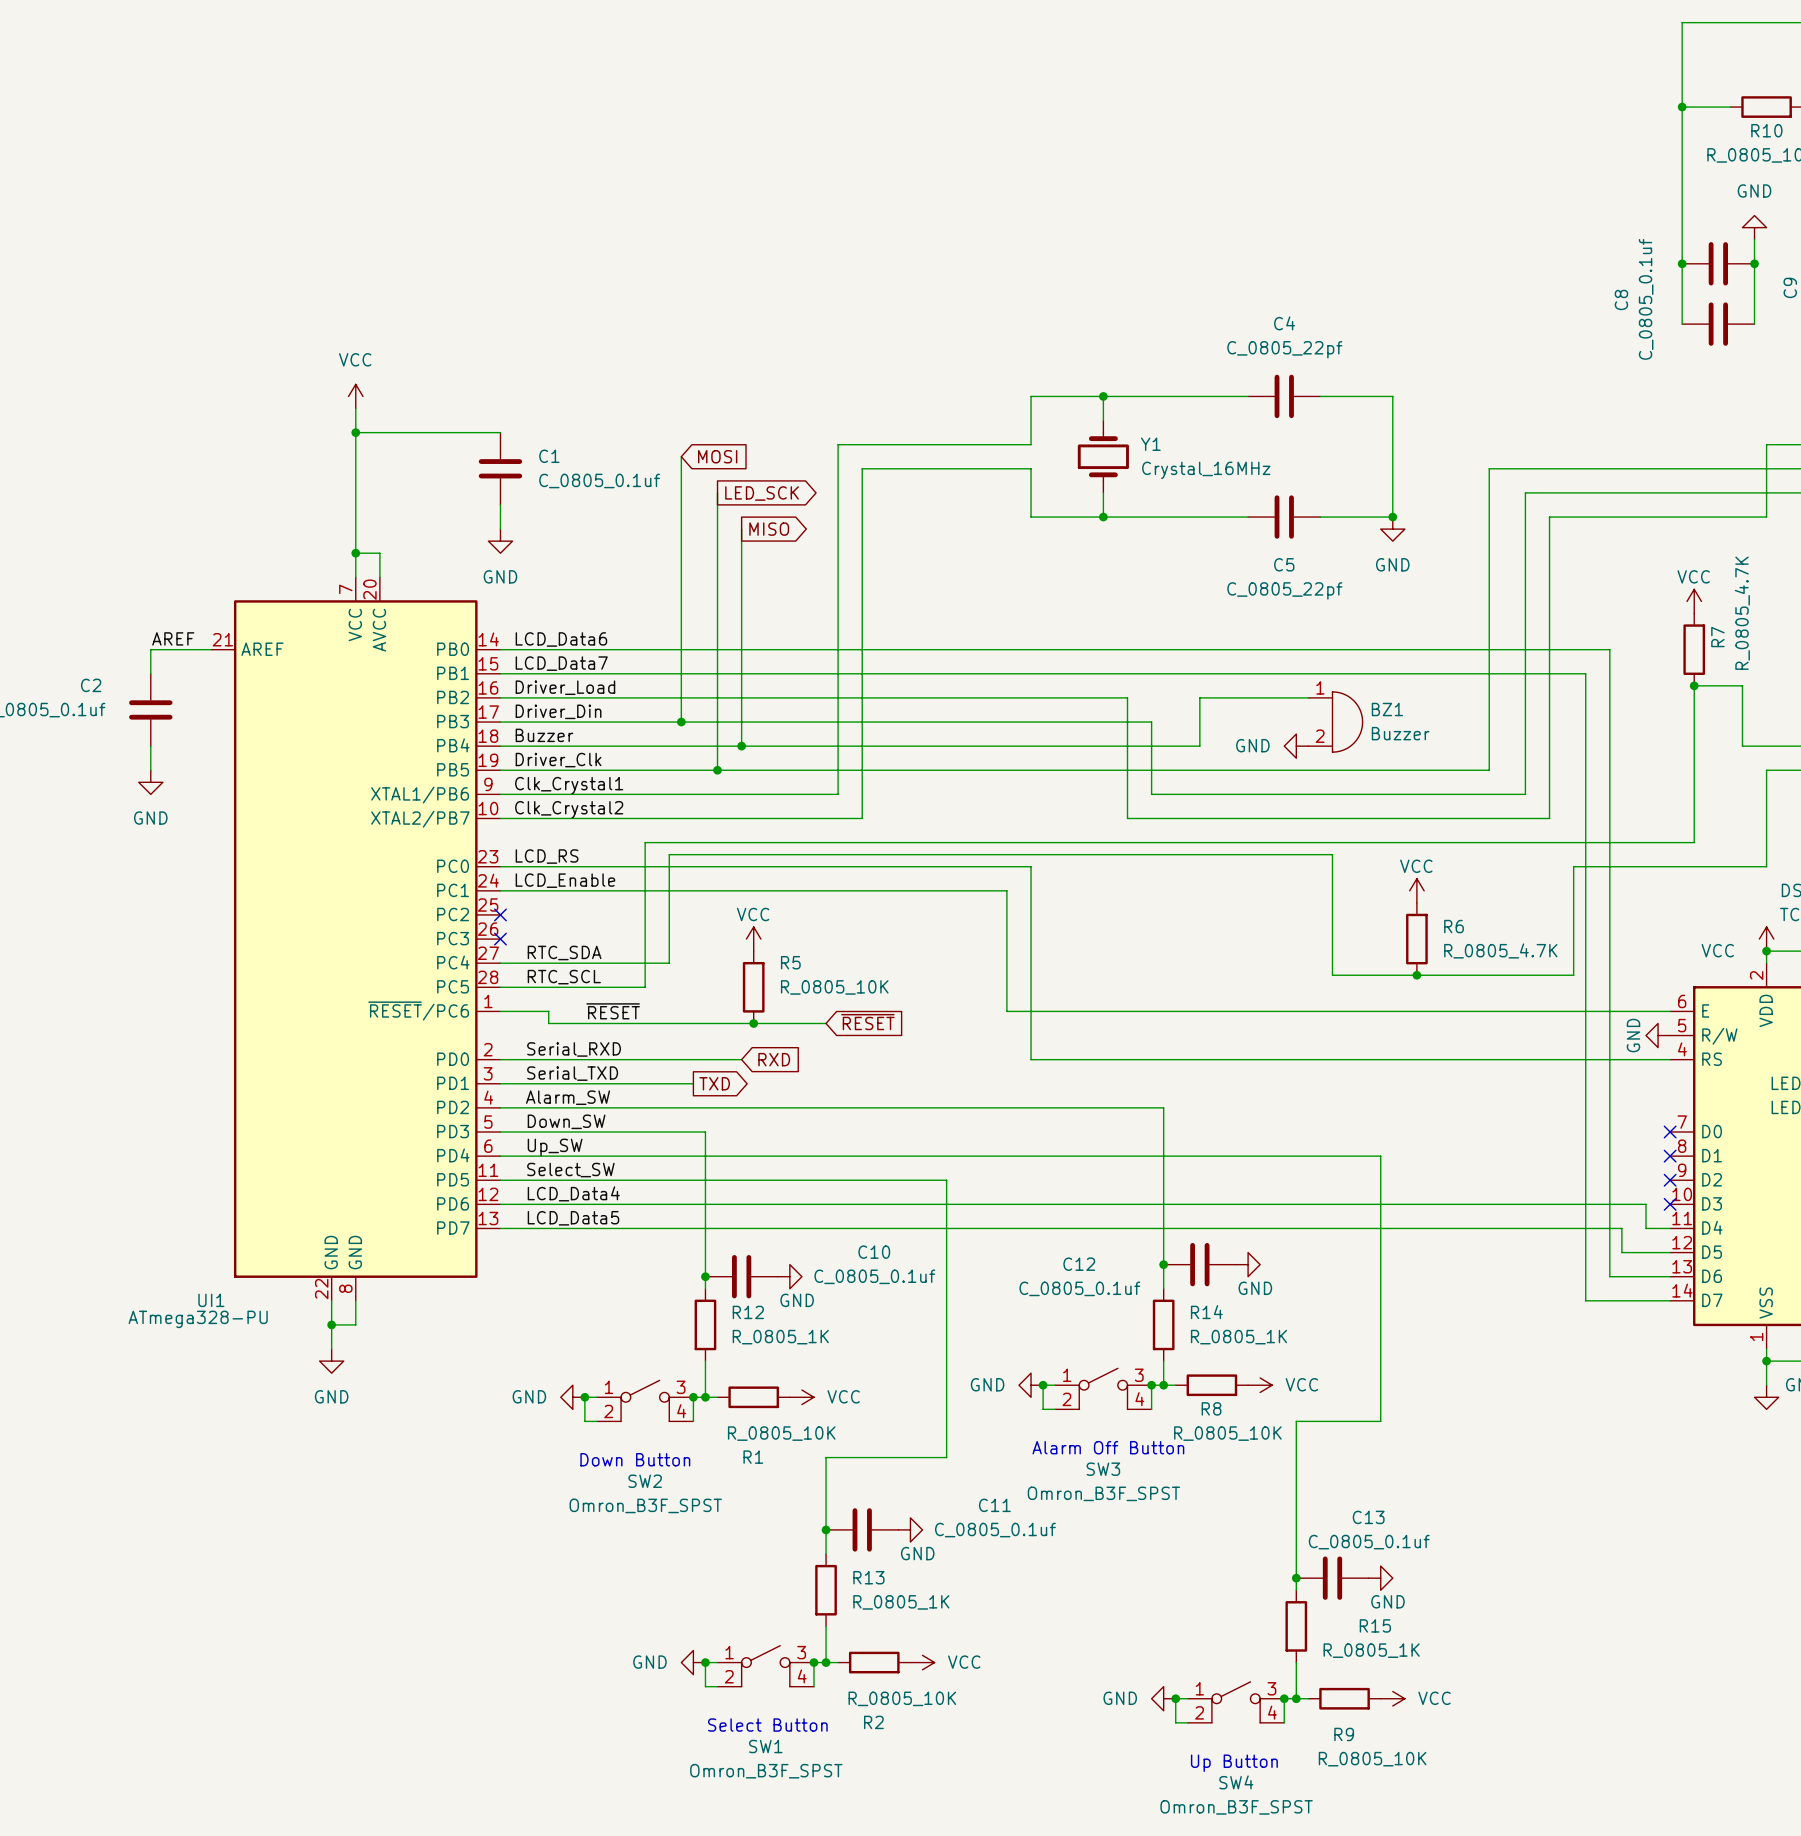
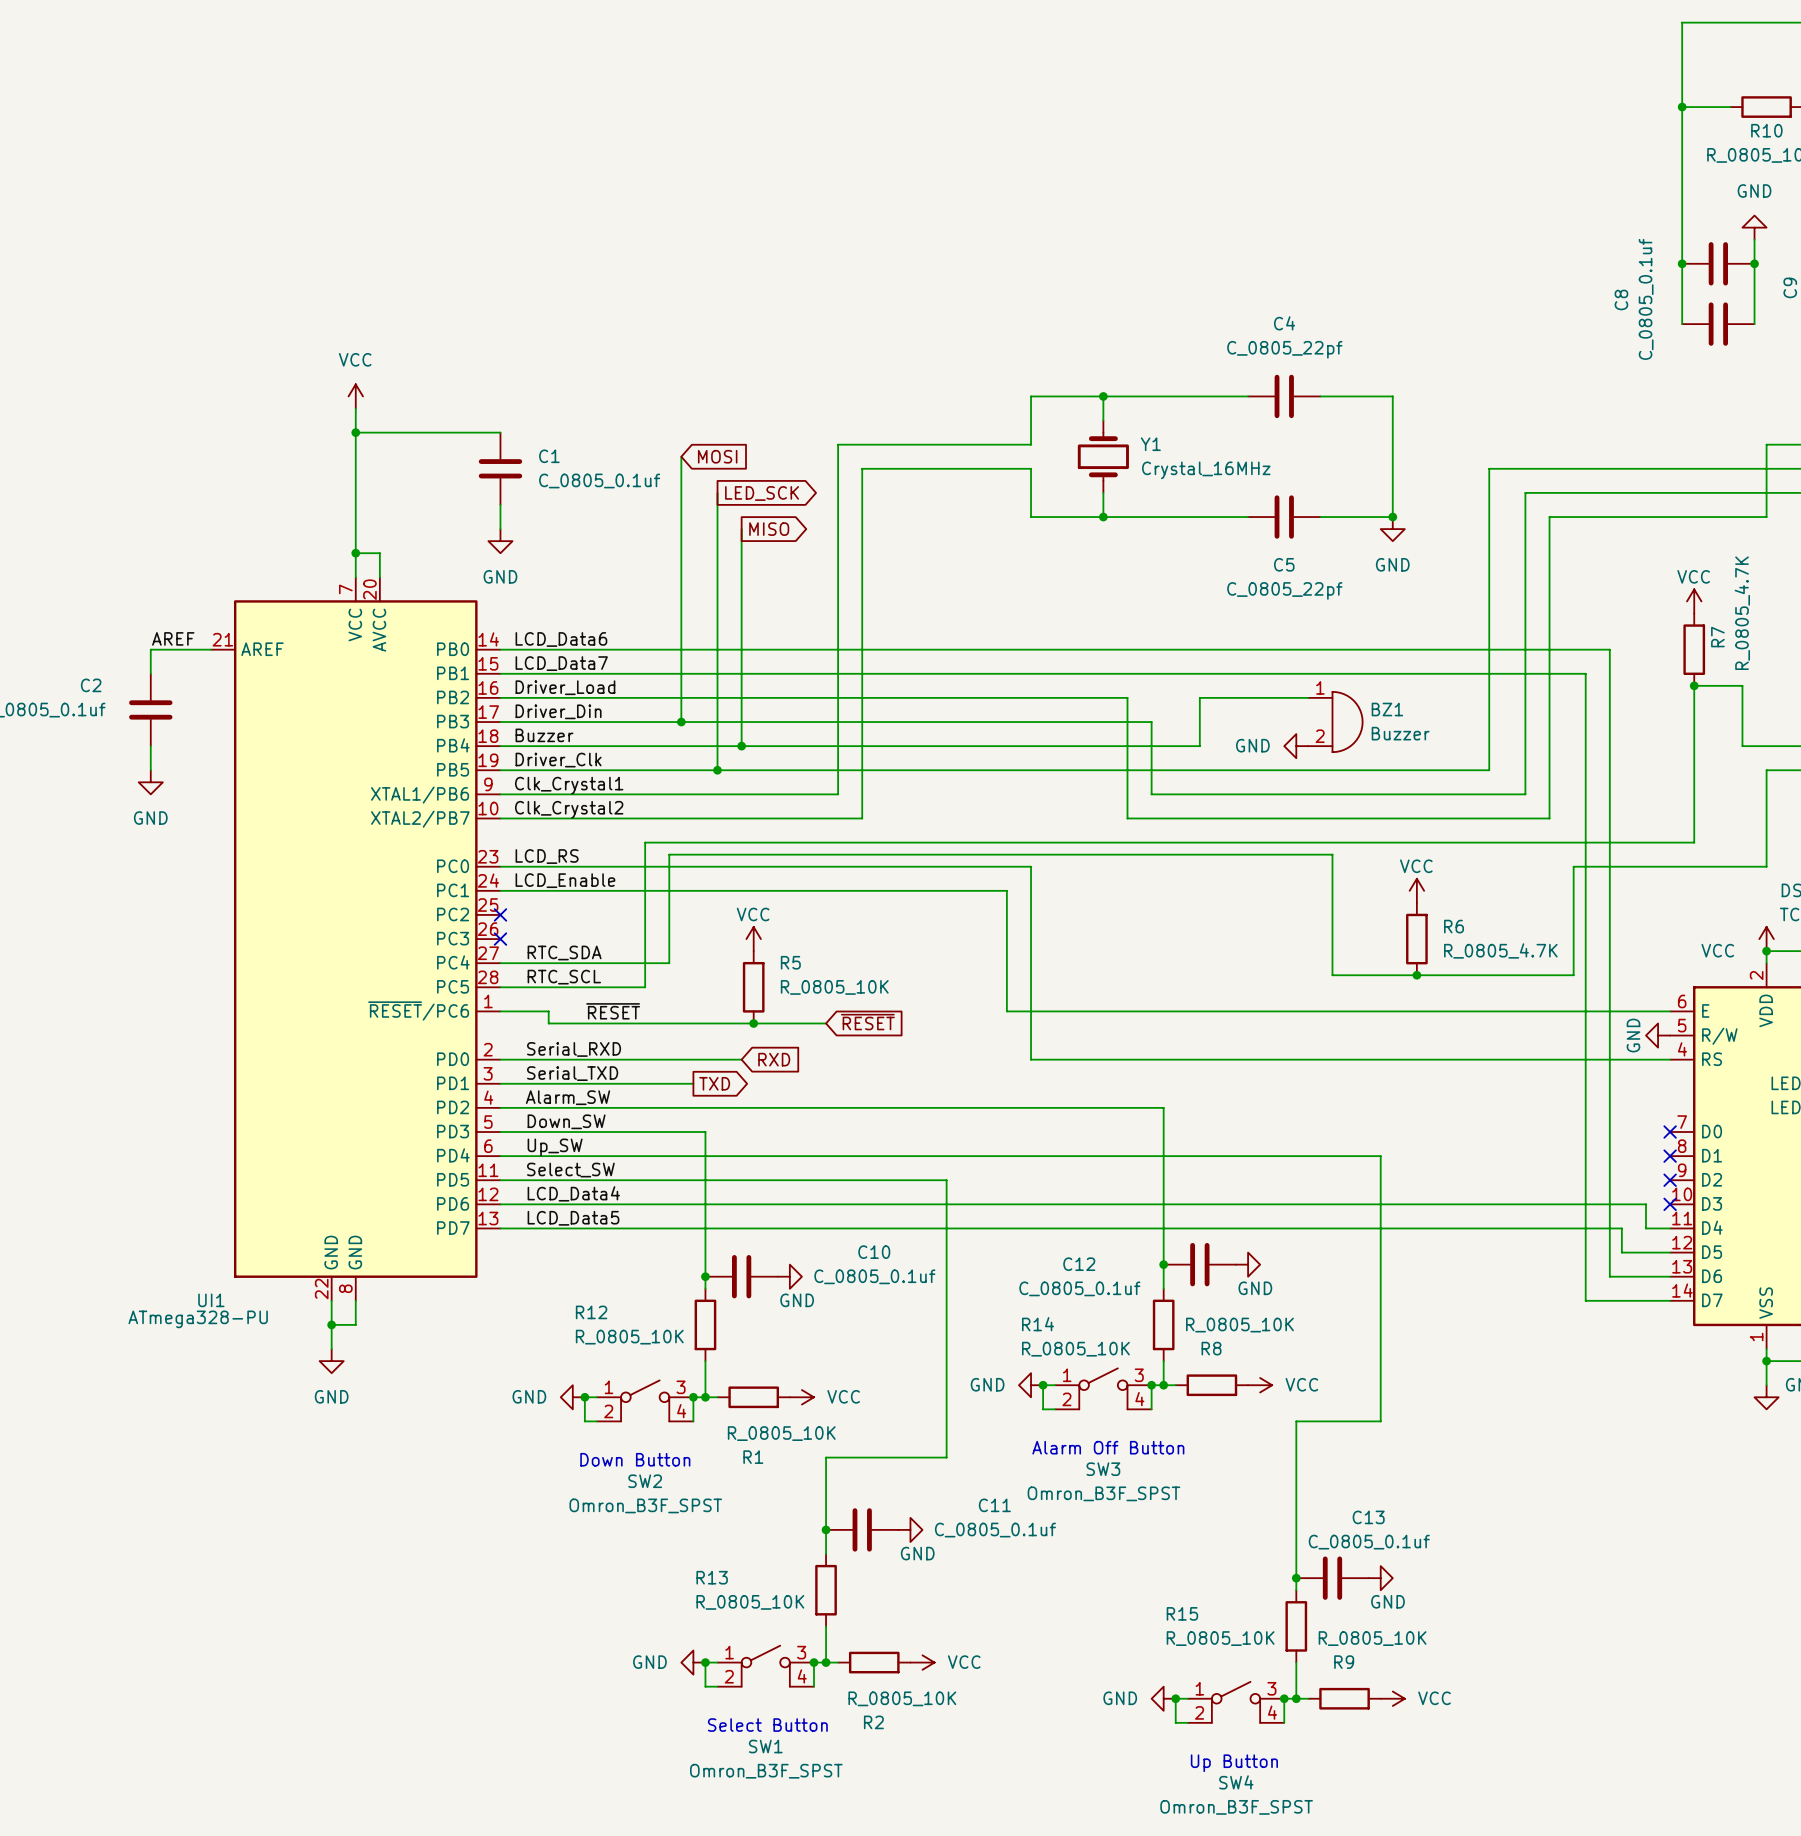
R12 name position: R12 (748, 1312) -> R12 (591, 1312)
R14 name position: R14 (1206, 1312) -> R14 (1038, 1324)
R12 value: R_0805_1K (780, 1337) -> R_0805_10K (629, 1337)
R14 value: R_0805_1K (1238, 1337) -> R_0805_10K (1075, 1349)
R8 name position: R8 (1211, 1408) -> R8 (1211, 1348)
R8 value position: R_0805_10K (1227, 1433) -> R_0805_10K (1239, 1325)
R13 name position: R13 (868, 1577) -> R13 (712, 1577)
R13 value: R_0805_1K (901, 1602) -> R_0805_10K (750, 1602)
R15 name position: R15 (1375, 1625) -> R15 (1182, 1613)
R15 value: R_0805_1K (1371, 1650) -> R_0805_10K (1220, 1638)
R9 name position: R9 (1344, 1734) -> R9 (1344, 1662)
R9 value position: R_0805_10K (1372, 1759) -> R_0805_10K (1372, 1638)

